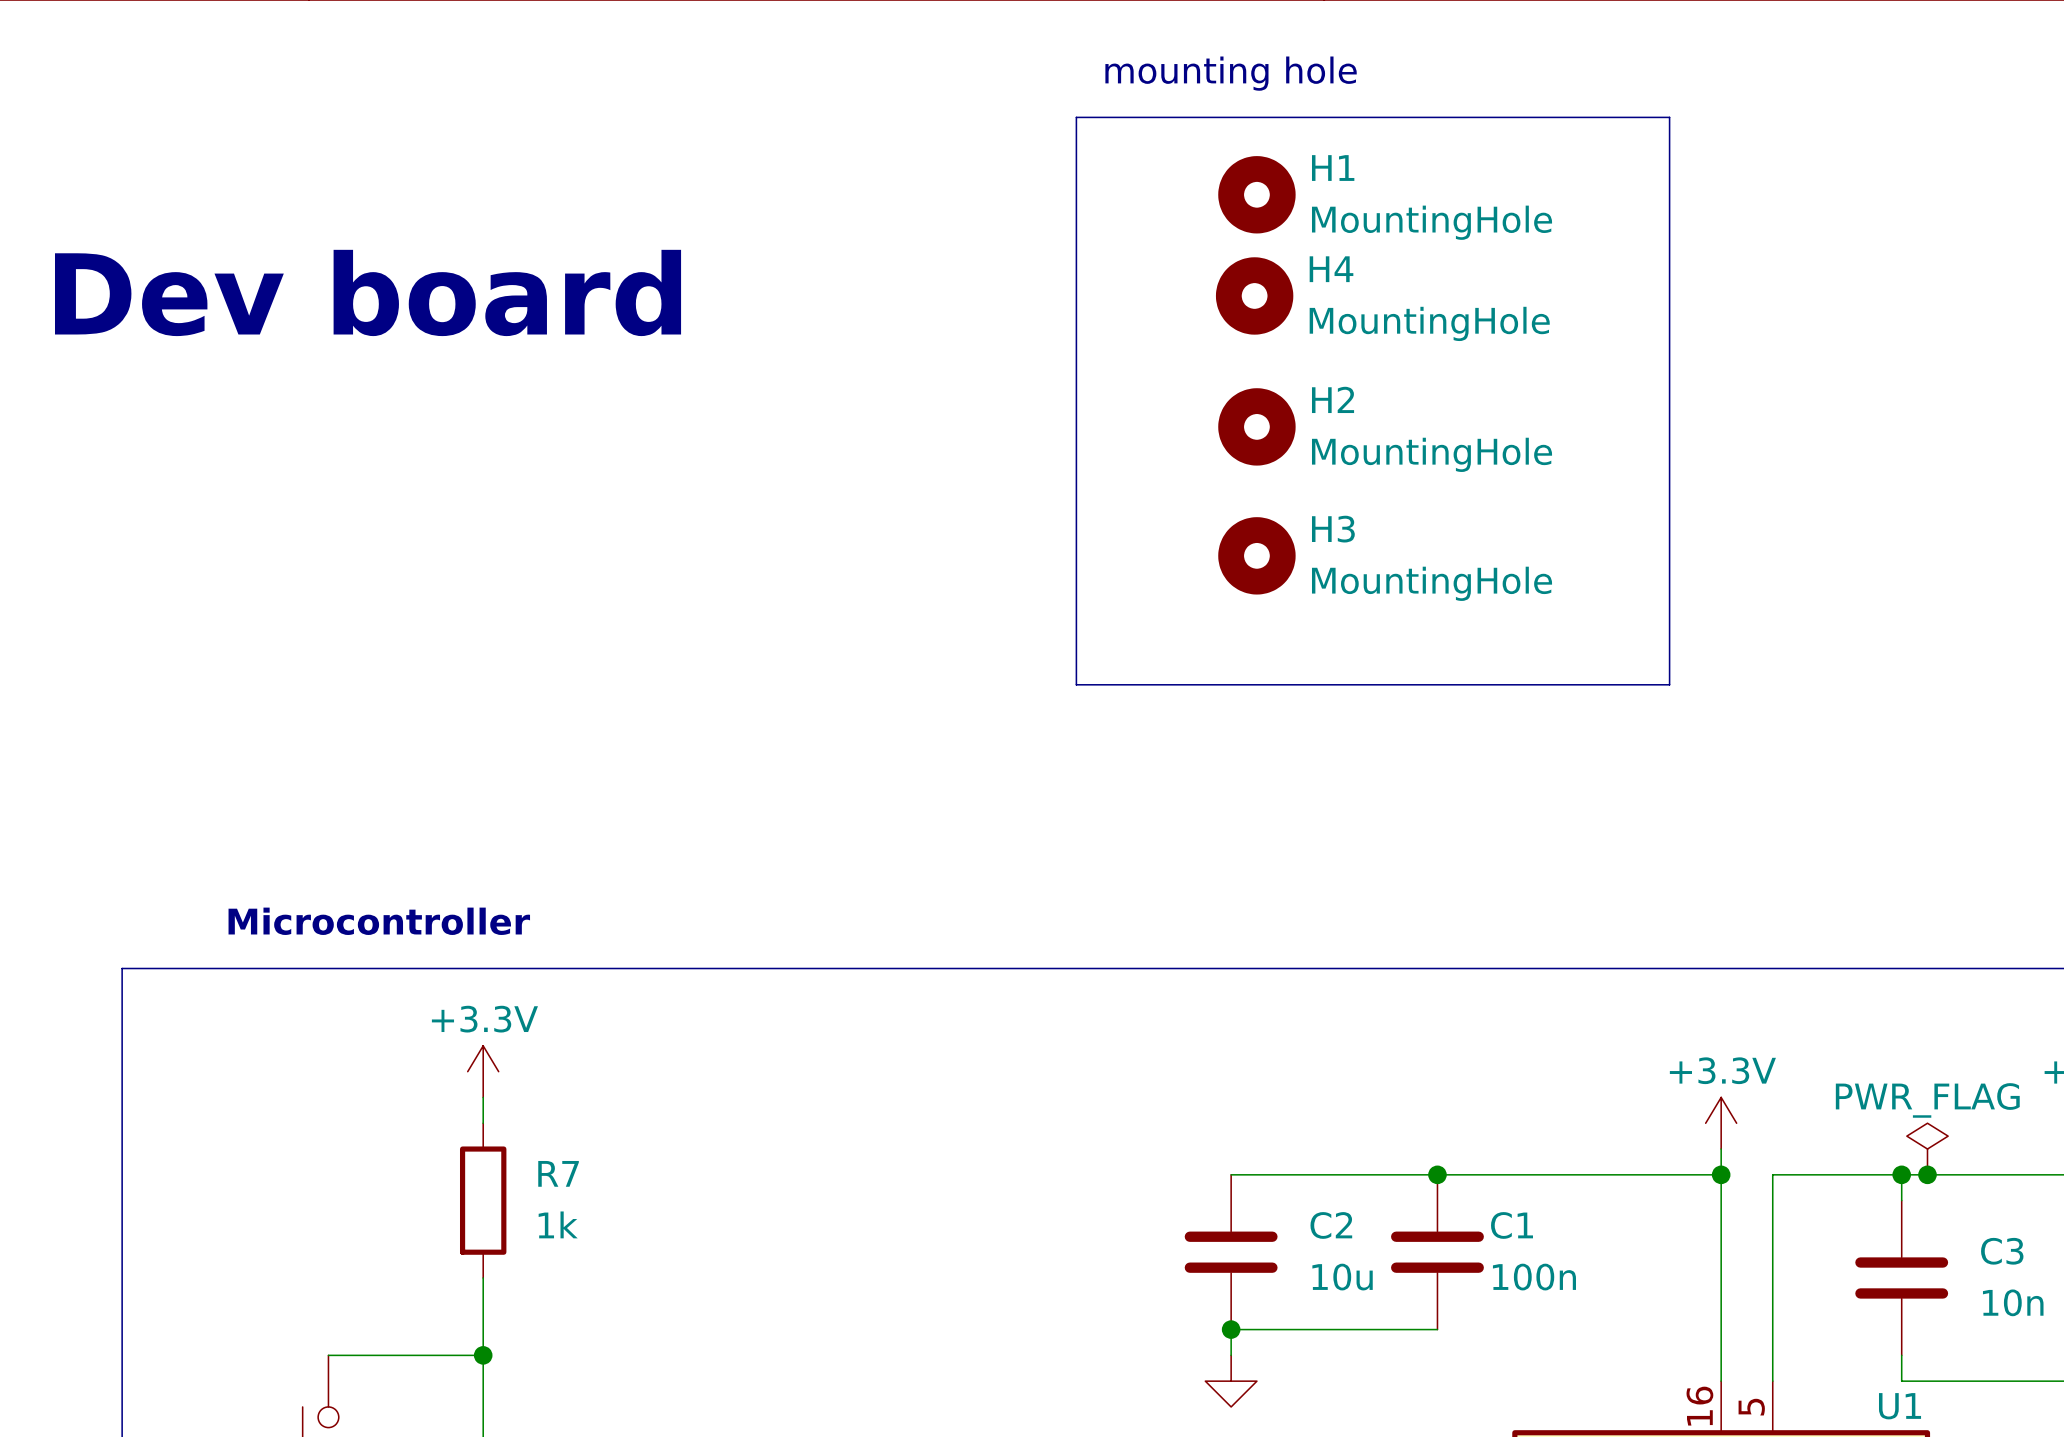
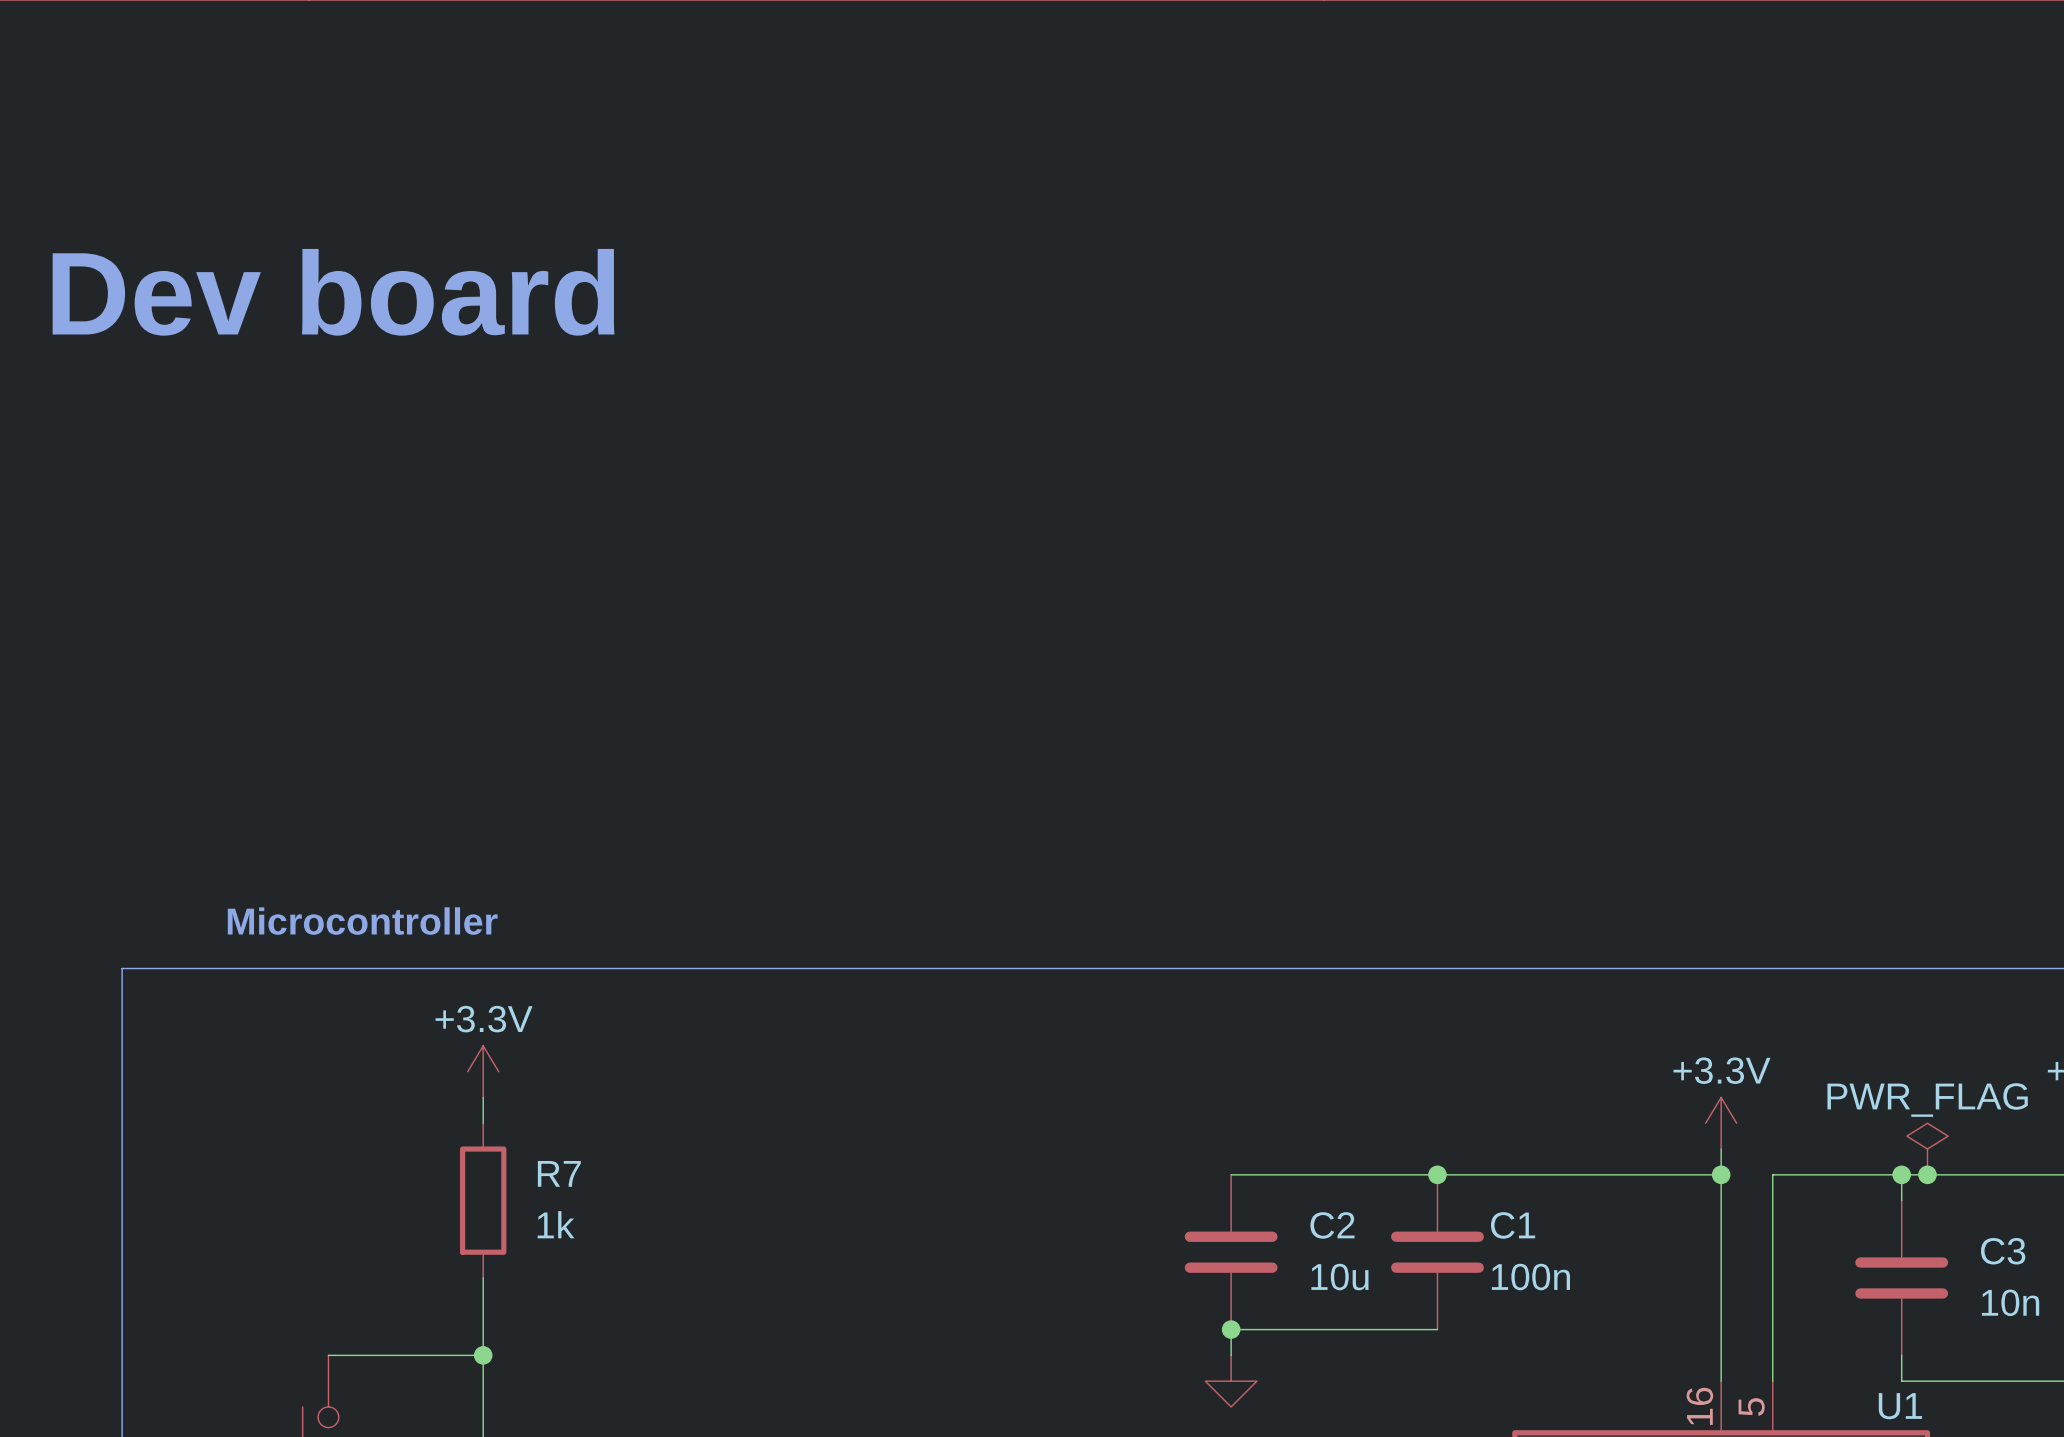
text: mounting hole (1231, 73) -> none
line: (1076, 117) (1669, 117) (1669, 684) (1076, 684) (1076, 117) -> none
H1: MountingHole (1256, 194) -> none
H4: MountingHole (1254, 295) -> none
H2: MountingHole (1256, 426) -> none
H3: MountingHole (1256, 555) -> none

